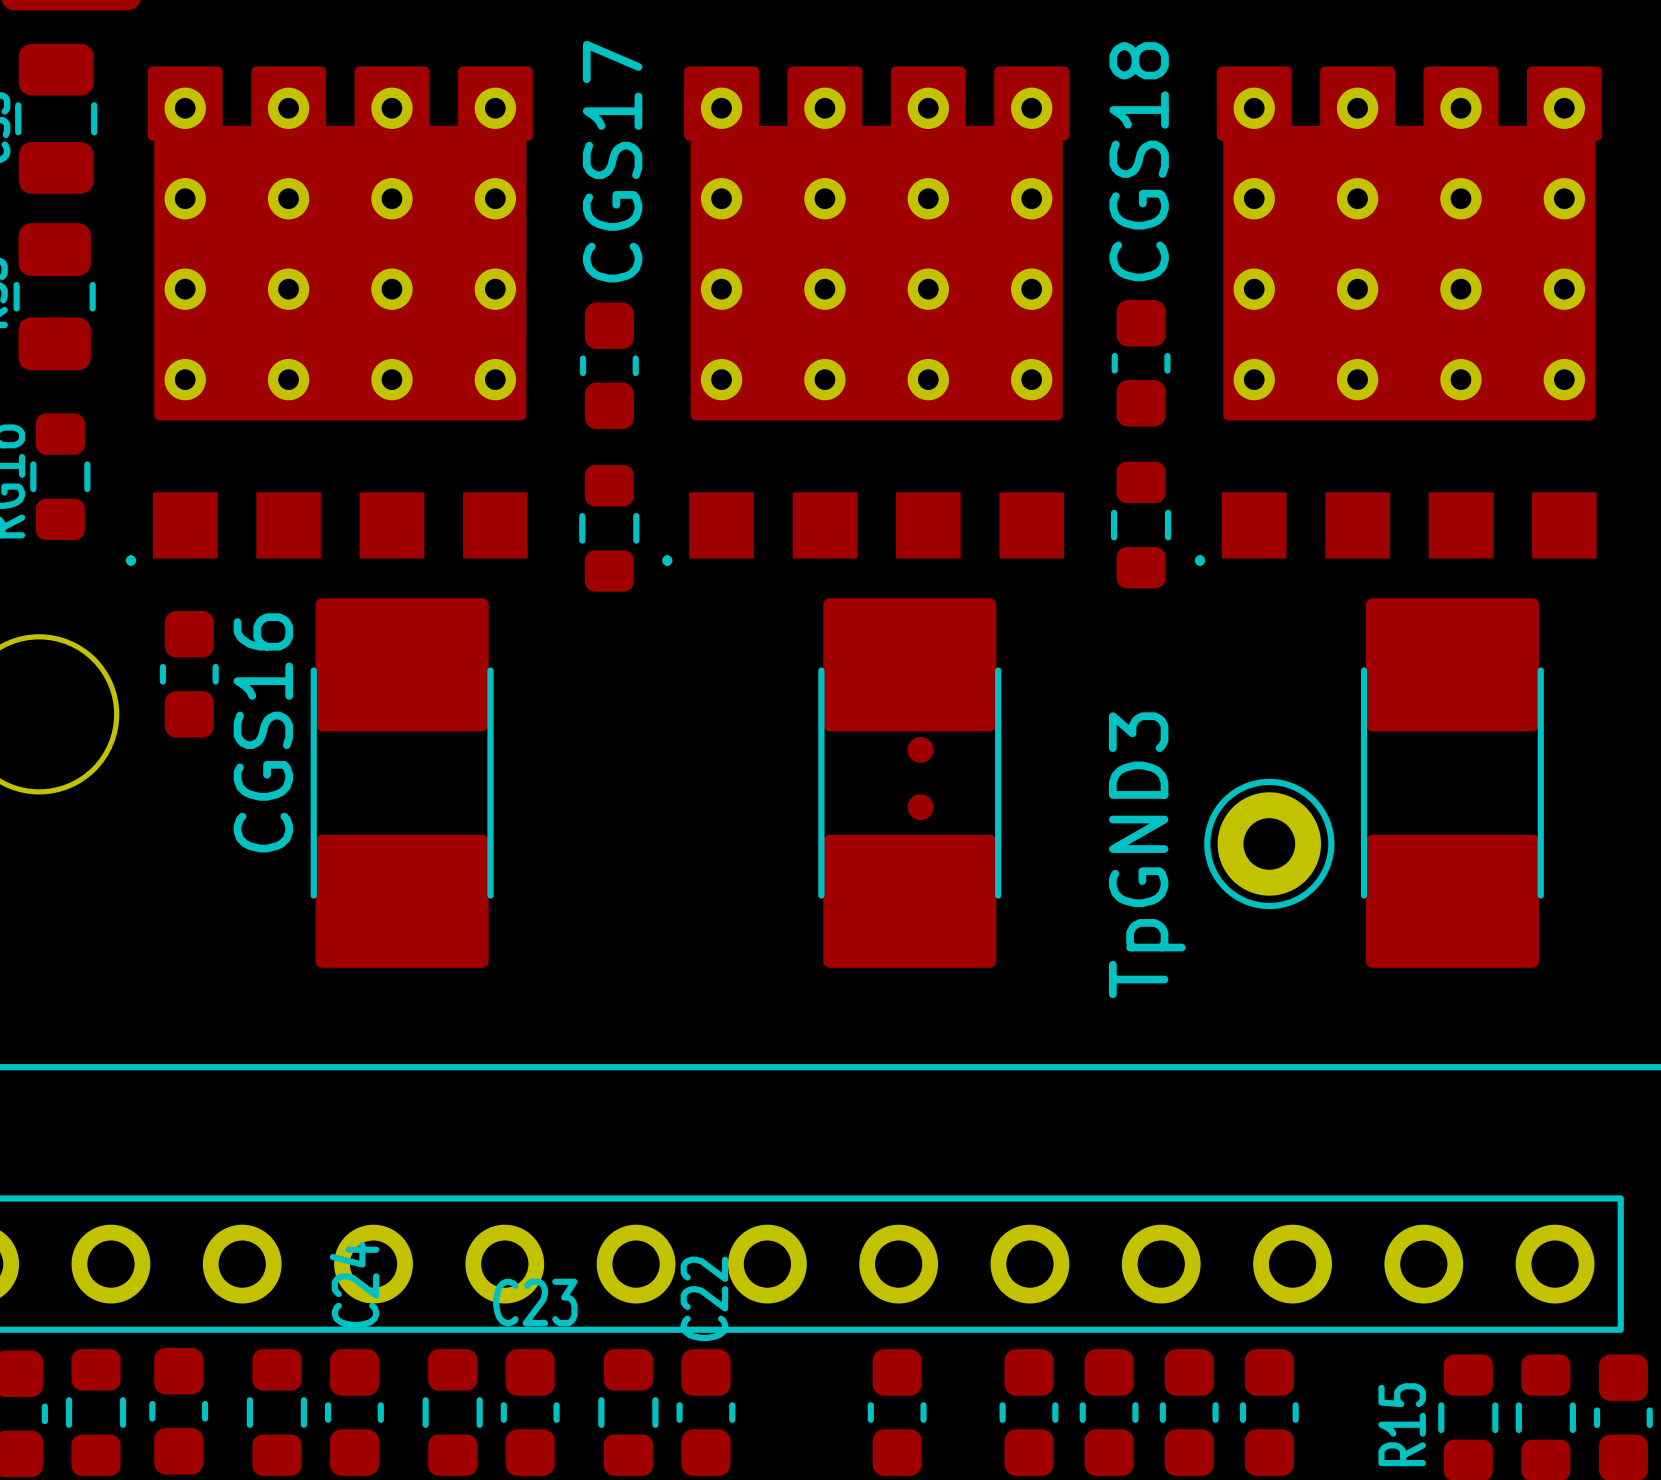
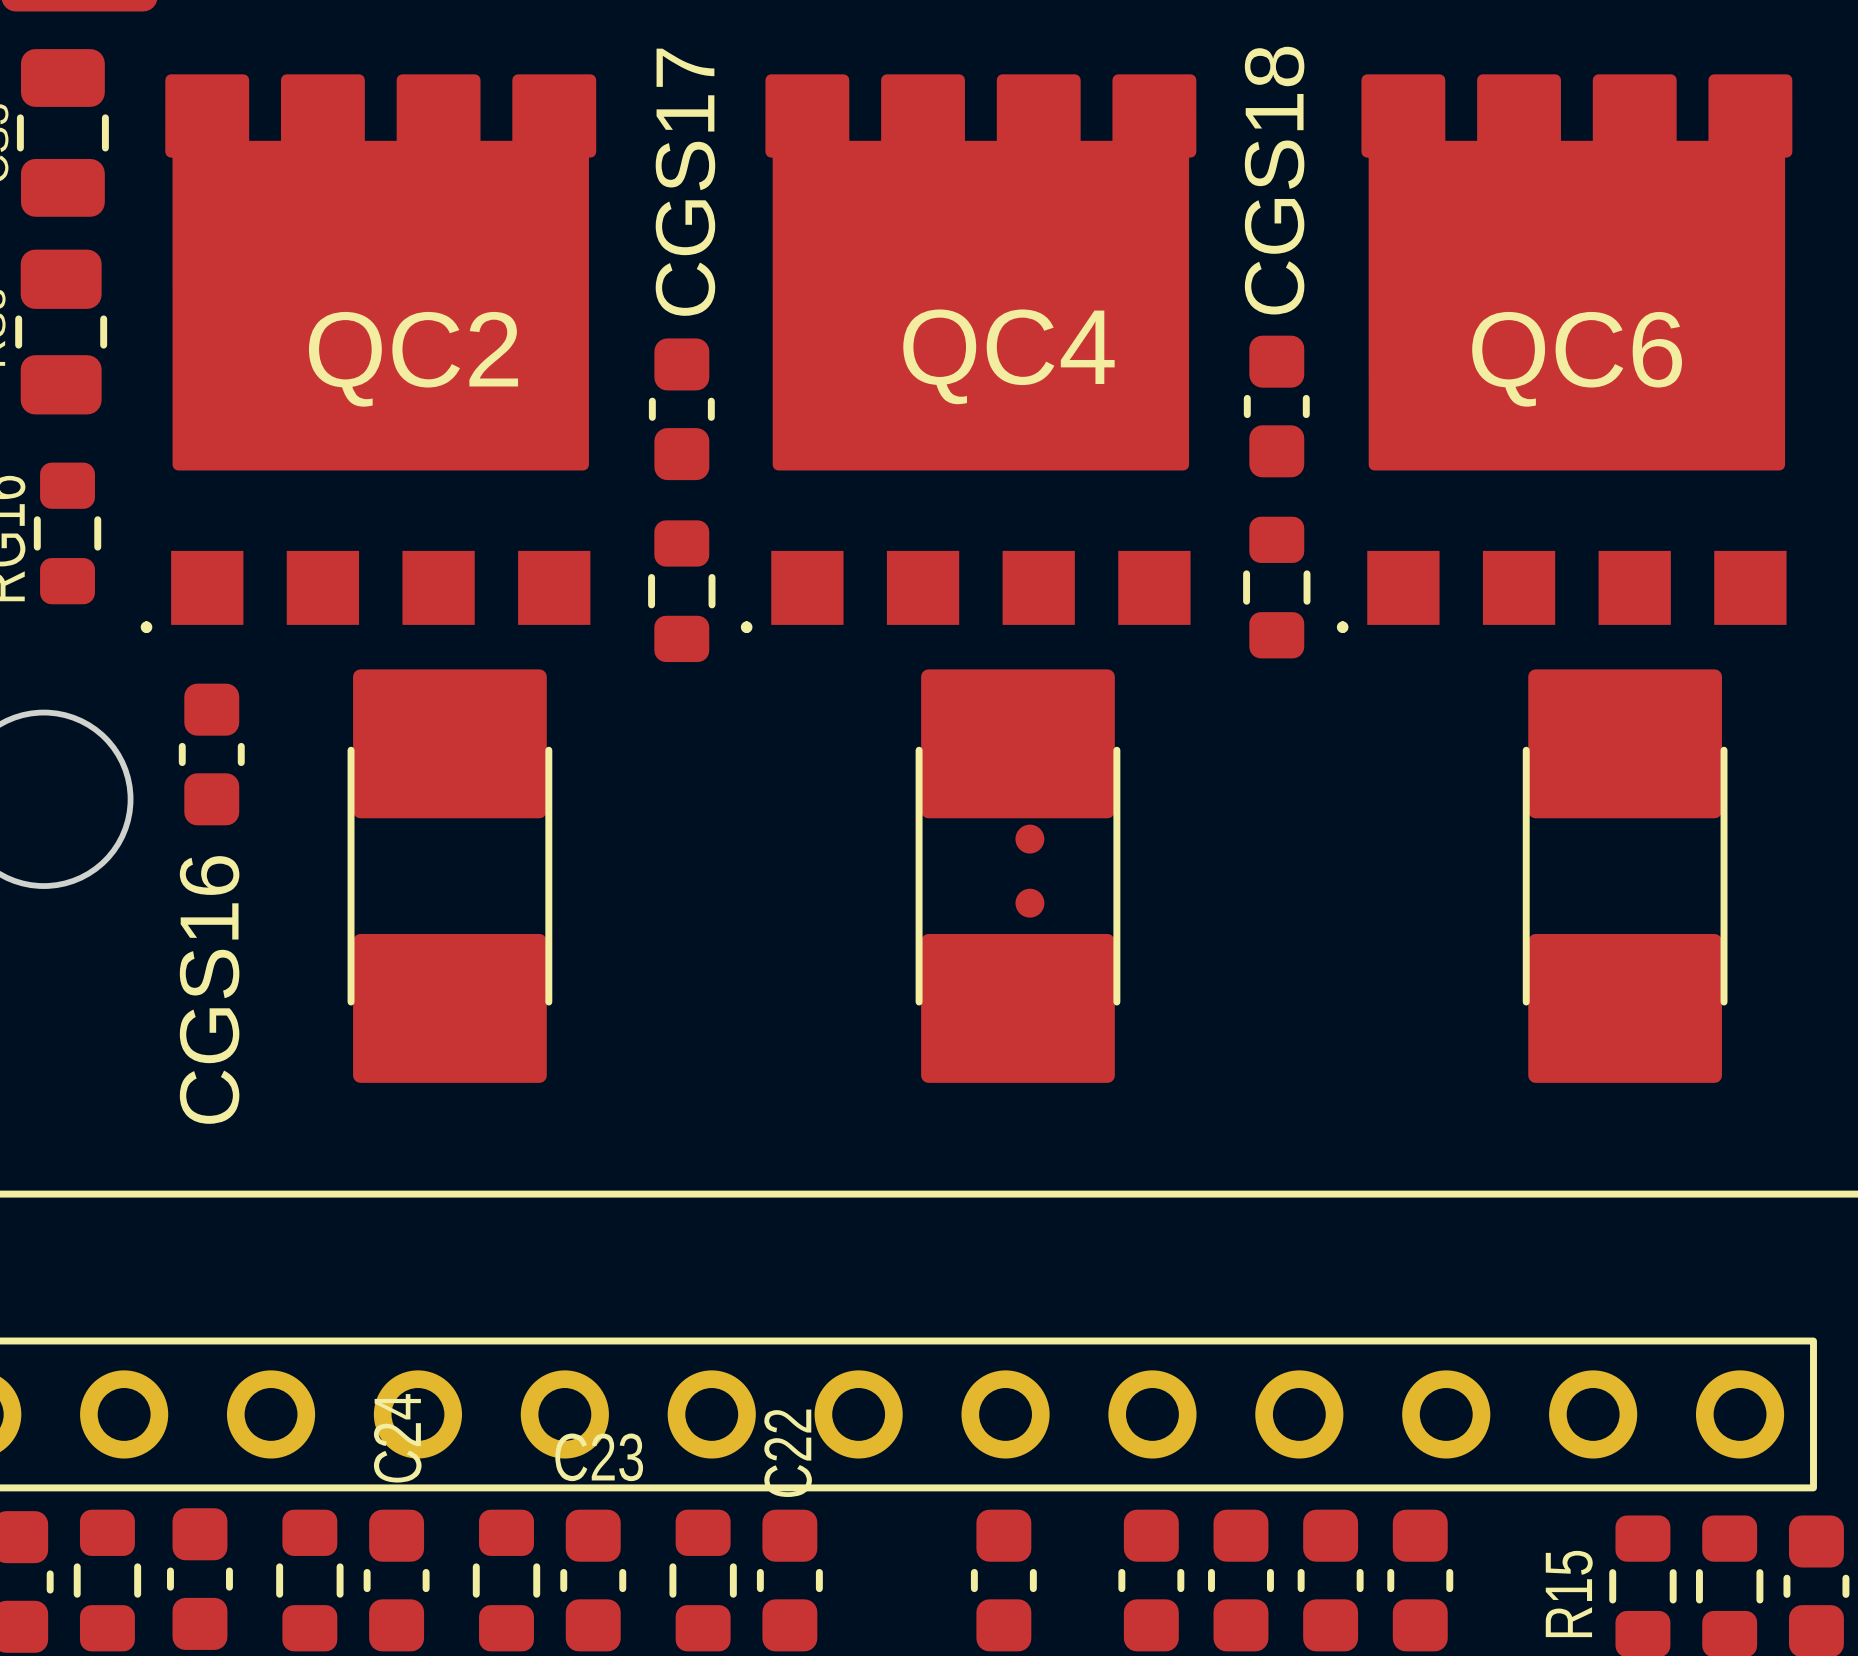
part: (329, 316) -> none
QC2: none -> (368, 353)
part: (865, 316) -> none
QC4: none -> (968, 353)
part: (1398, 316) -> none
QC6: none -> (1564, 353)
CGS16 name position: CGS16 (263, 732) -> CGS16 (209, 989)
TpGND3: (1269, 843) -> none

